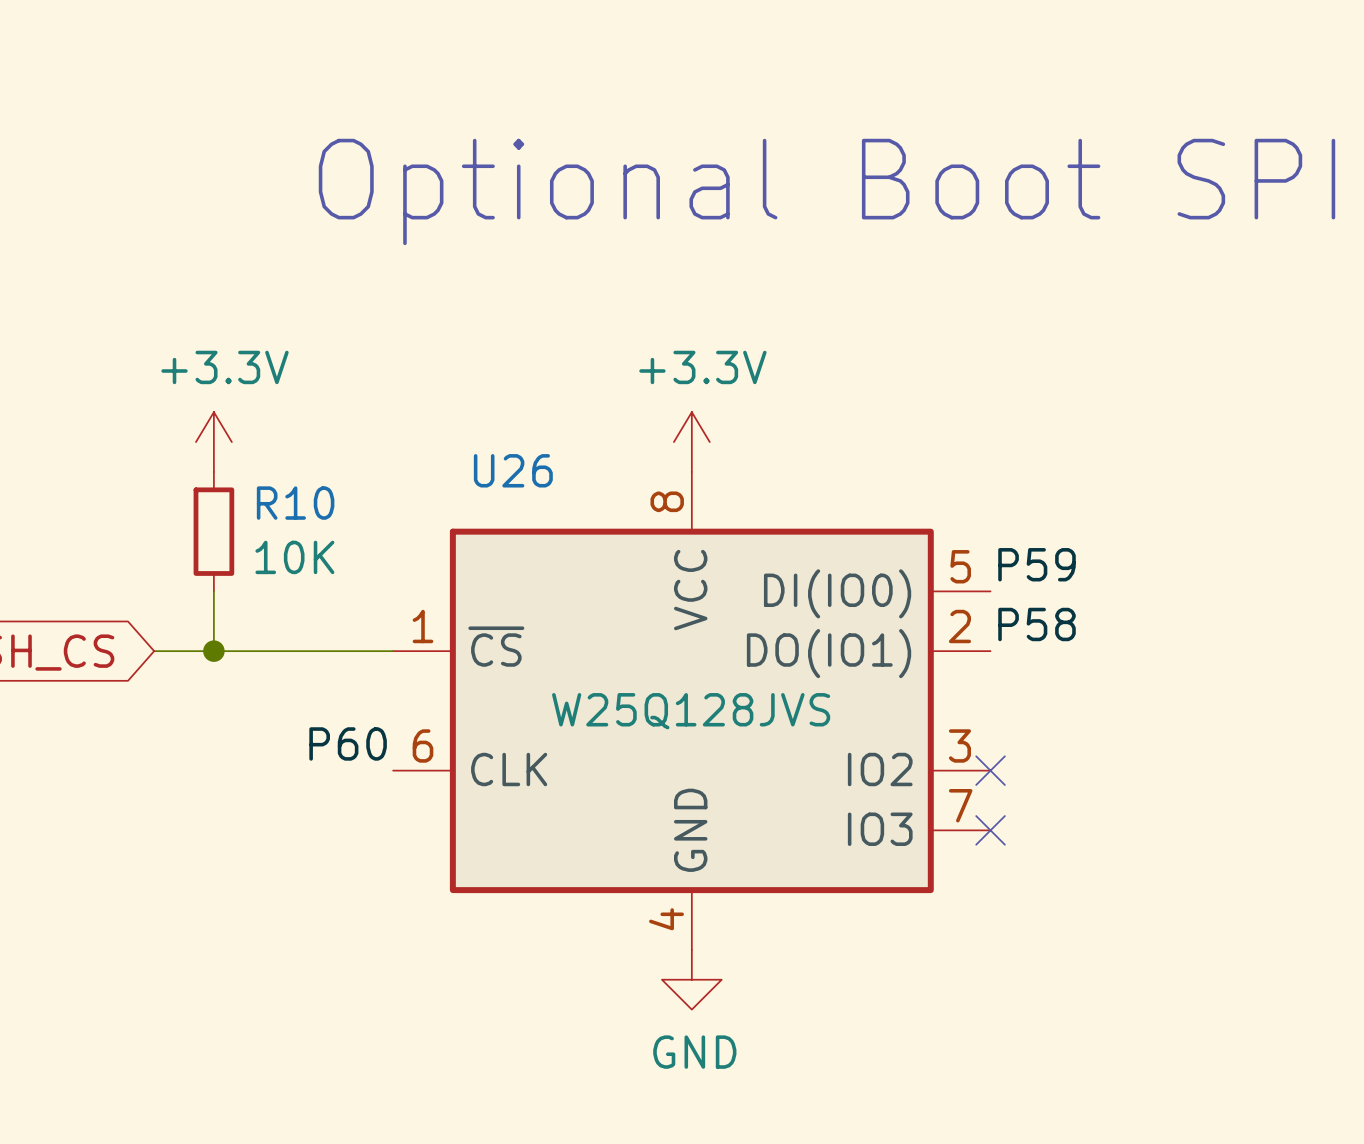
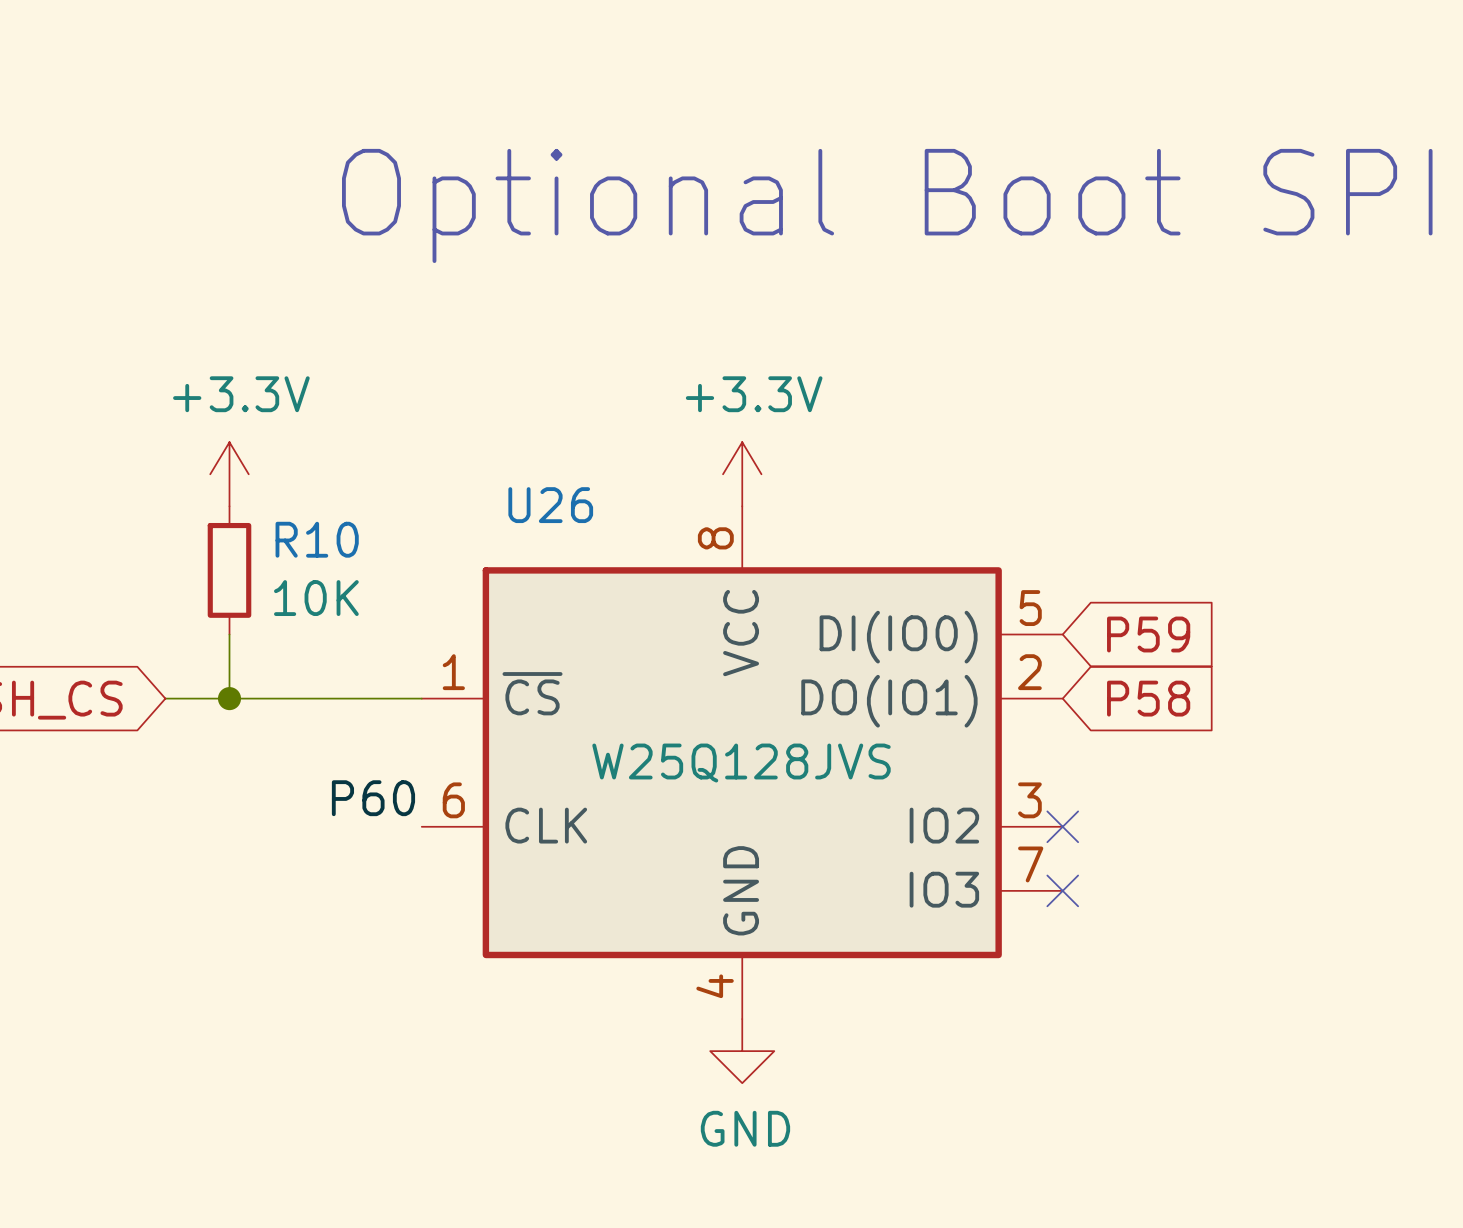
label: P59 (1037, 564) -> none
global label: none -> P59 (1148, 634)
label: P58 (1037, 624) -> none
global label: none -> P58 (1148, 698)

